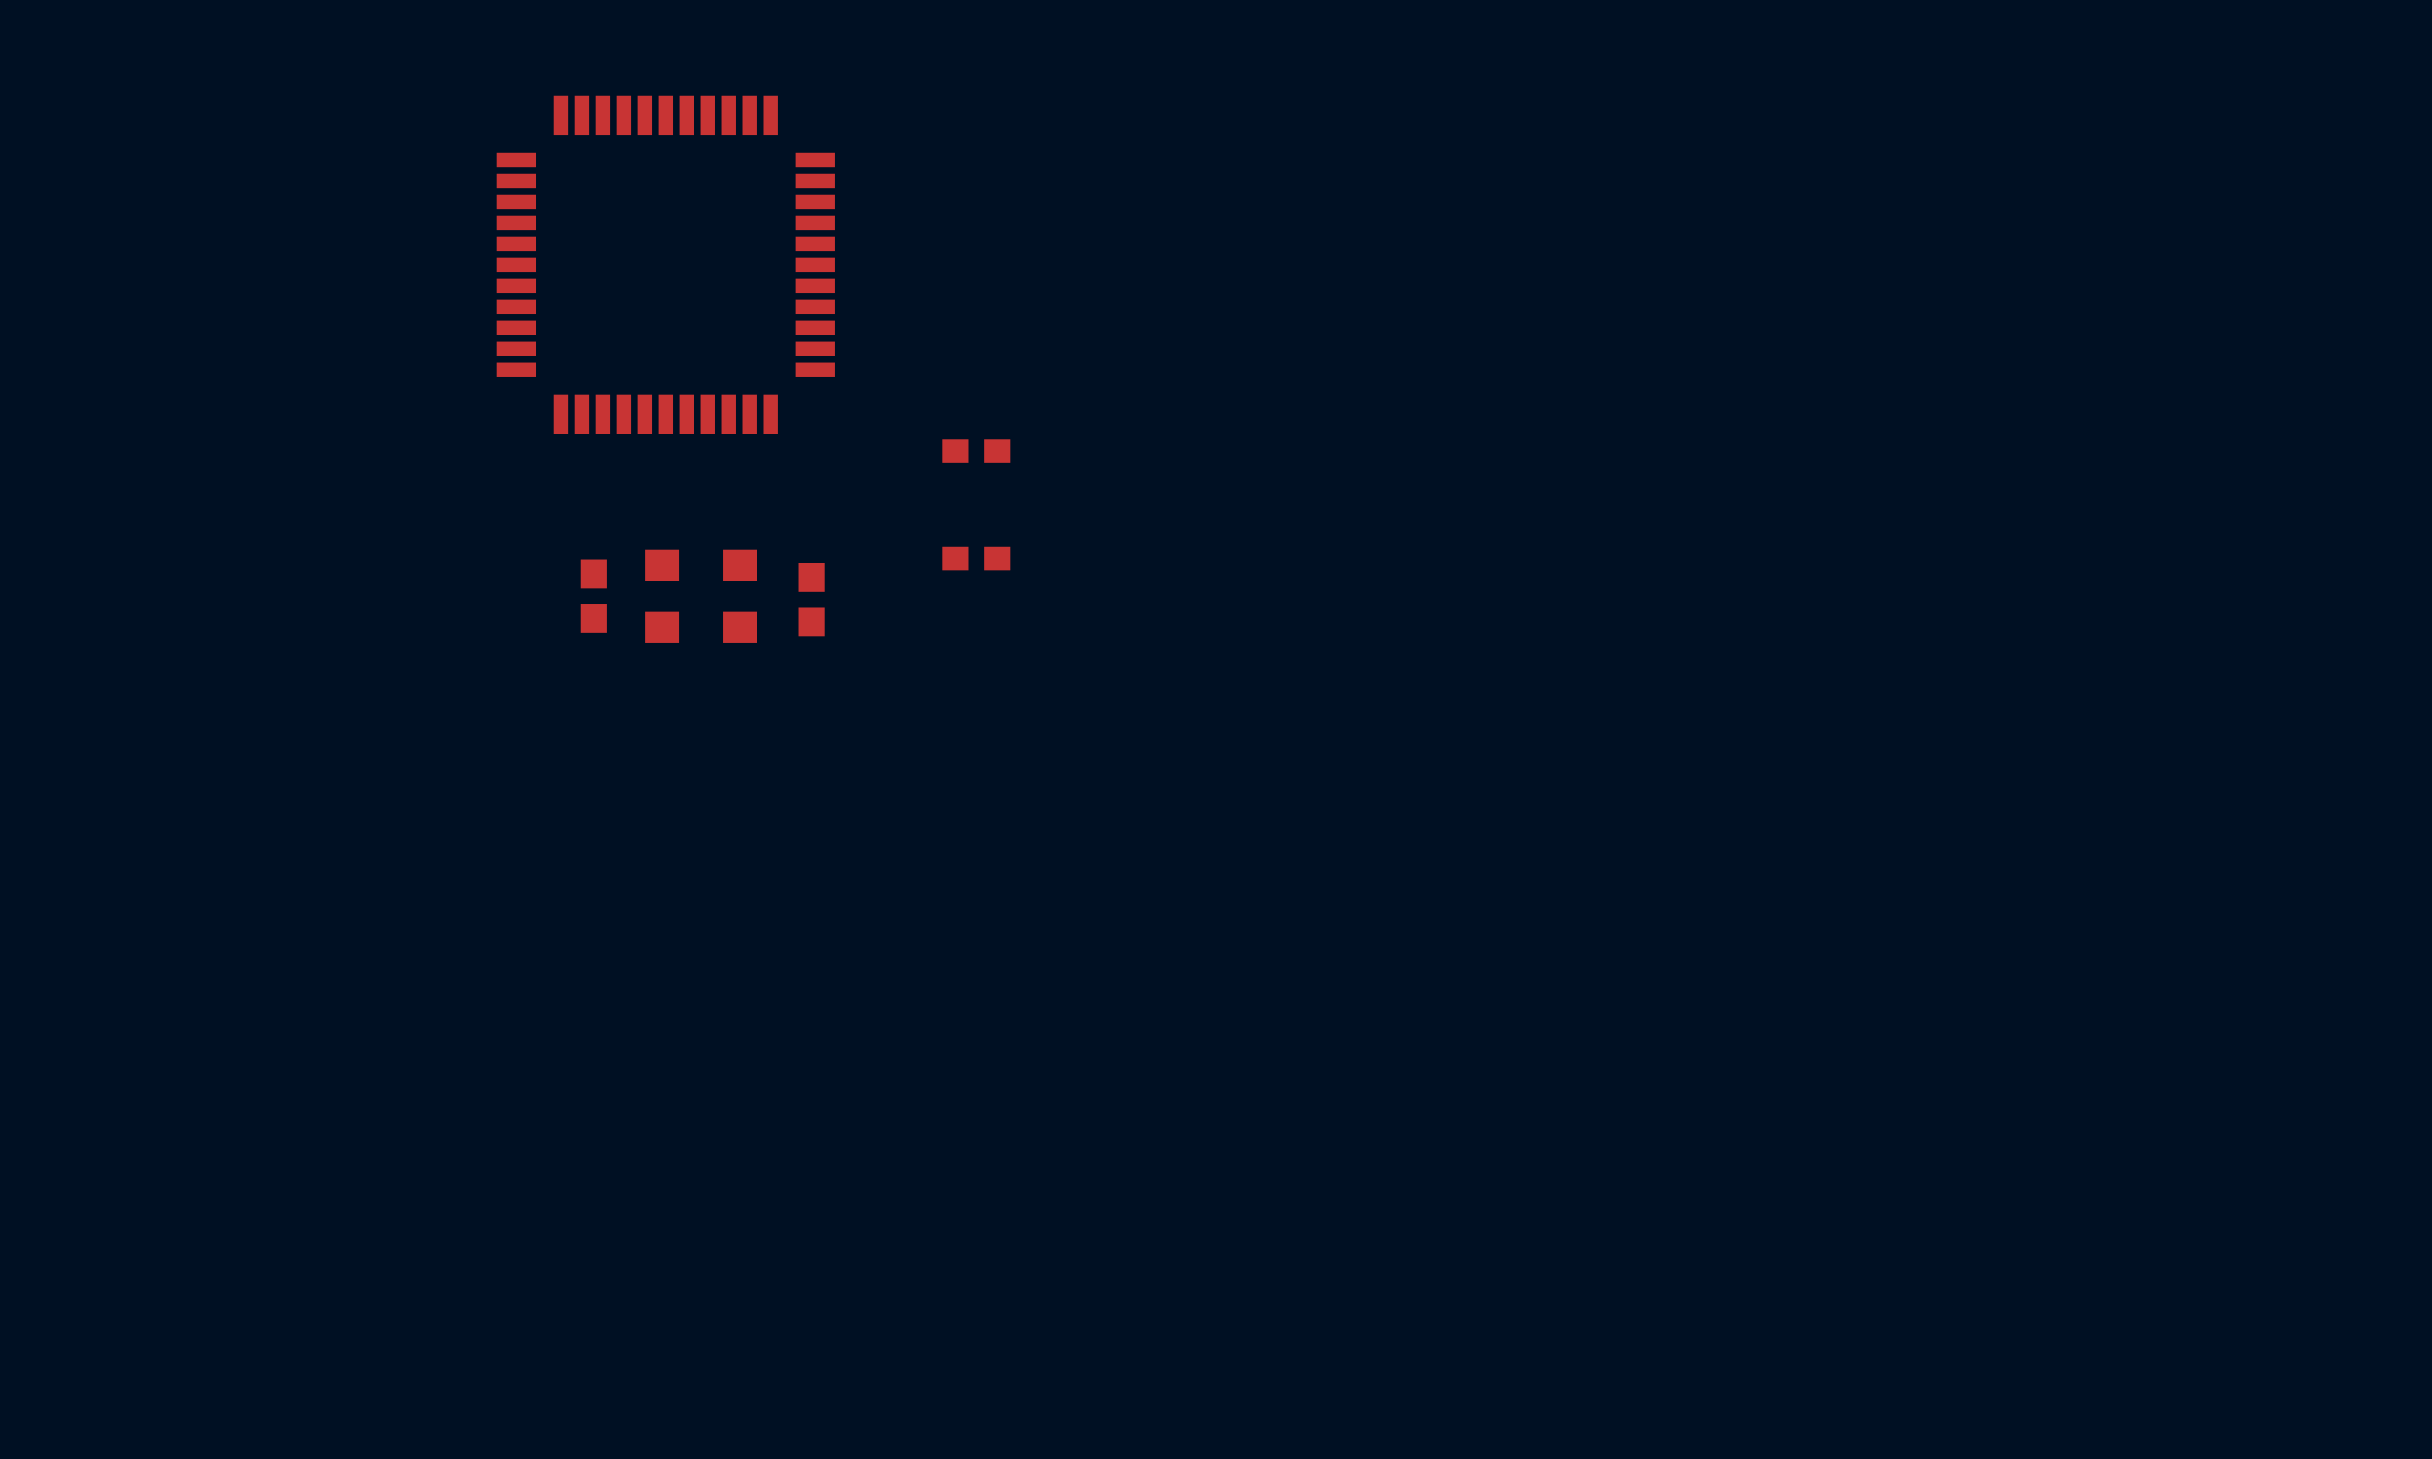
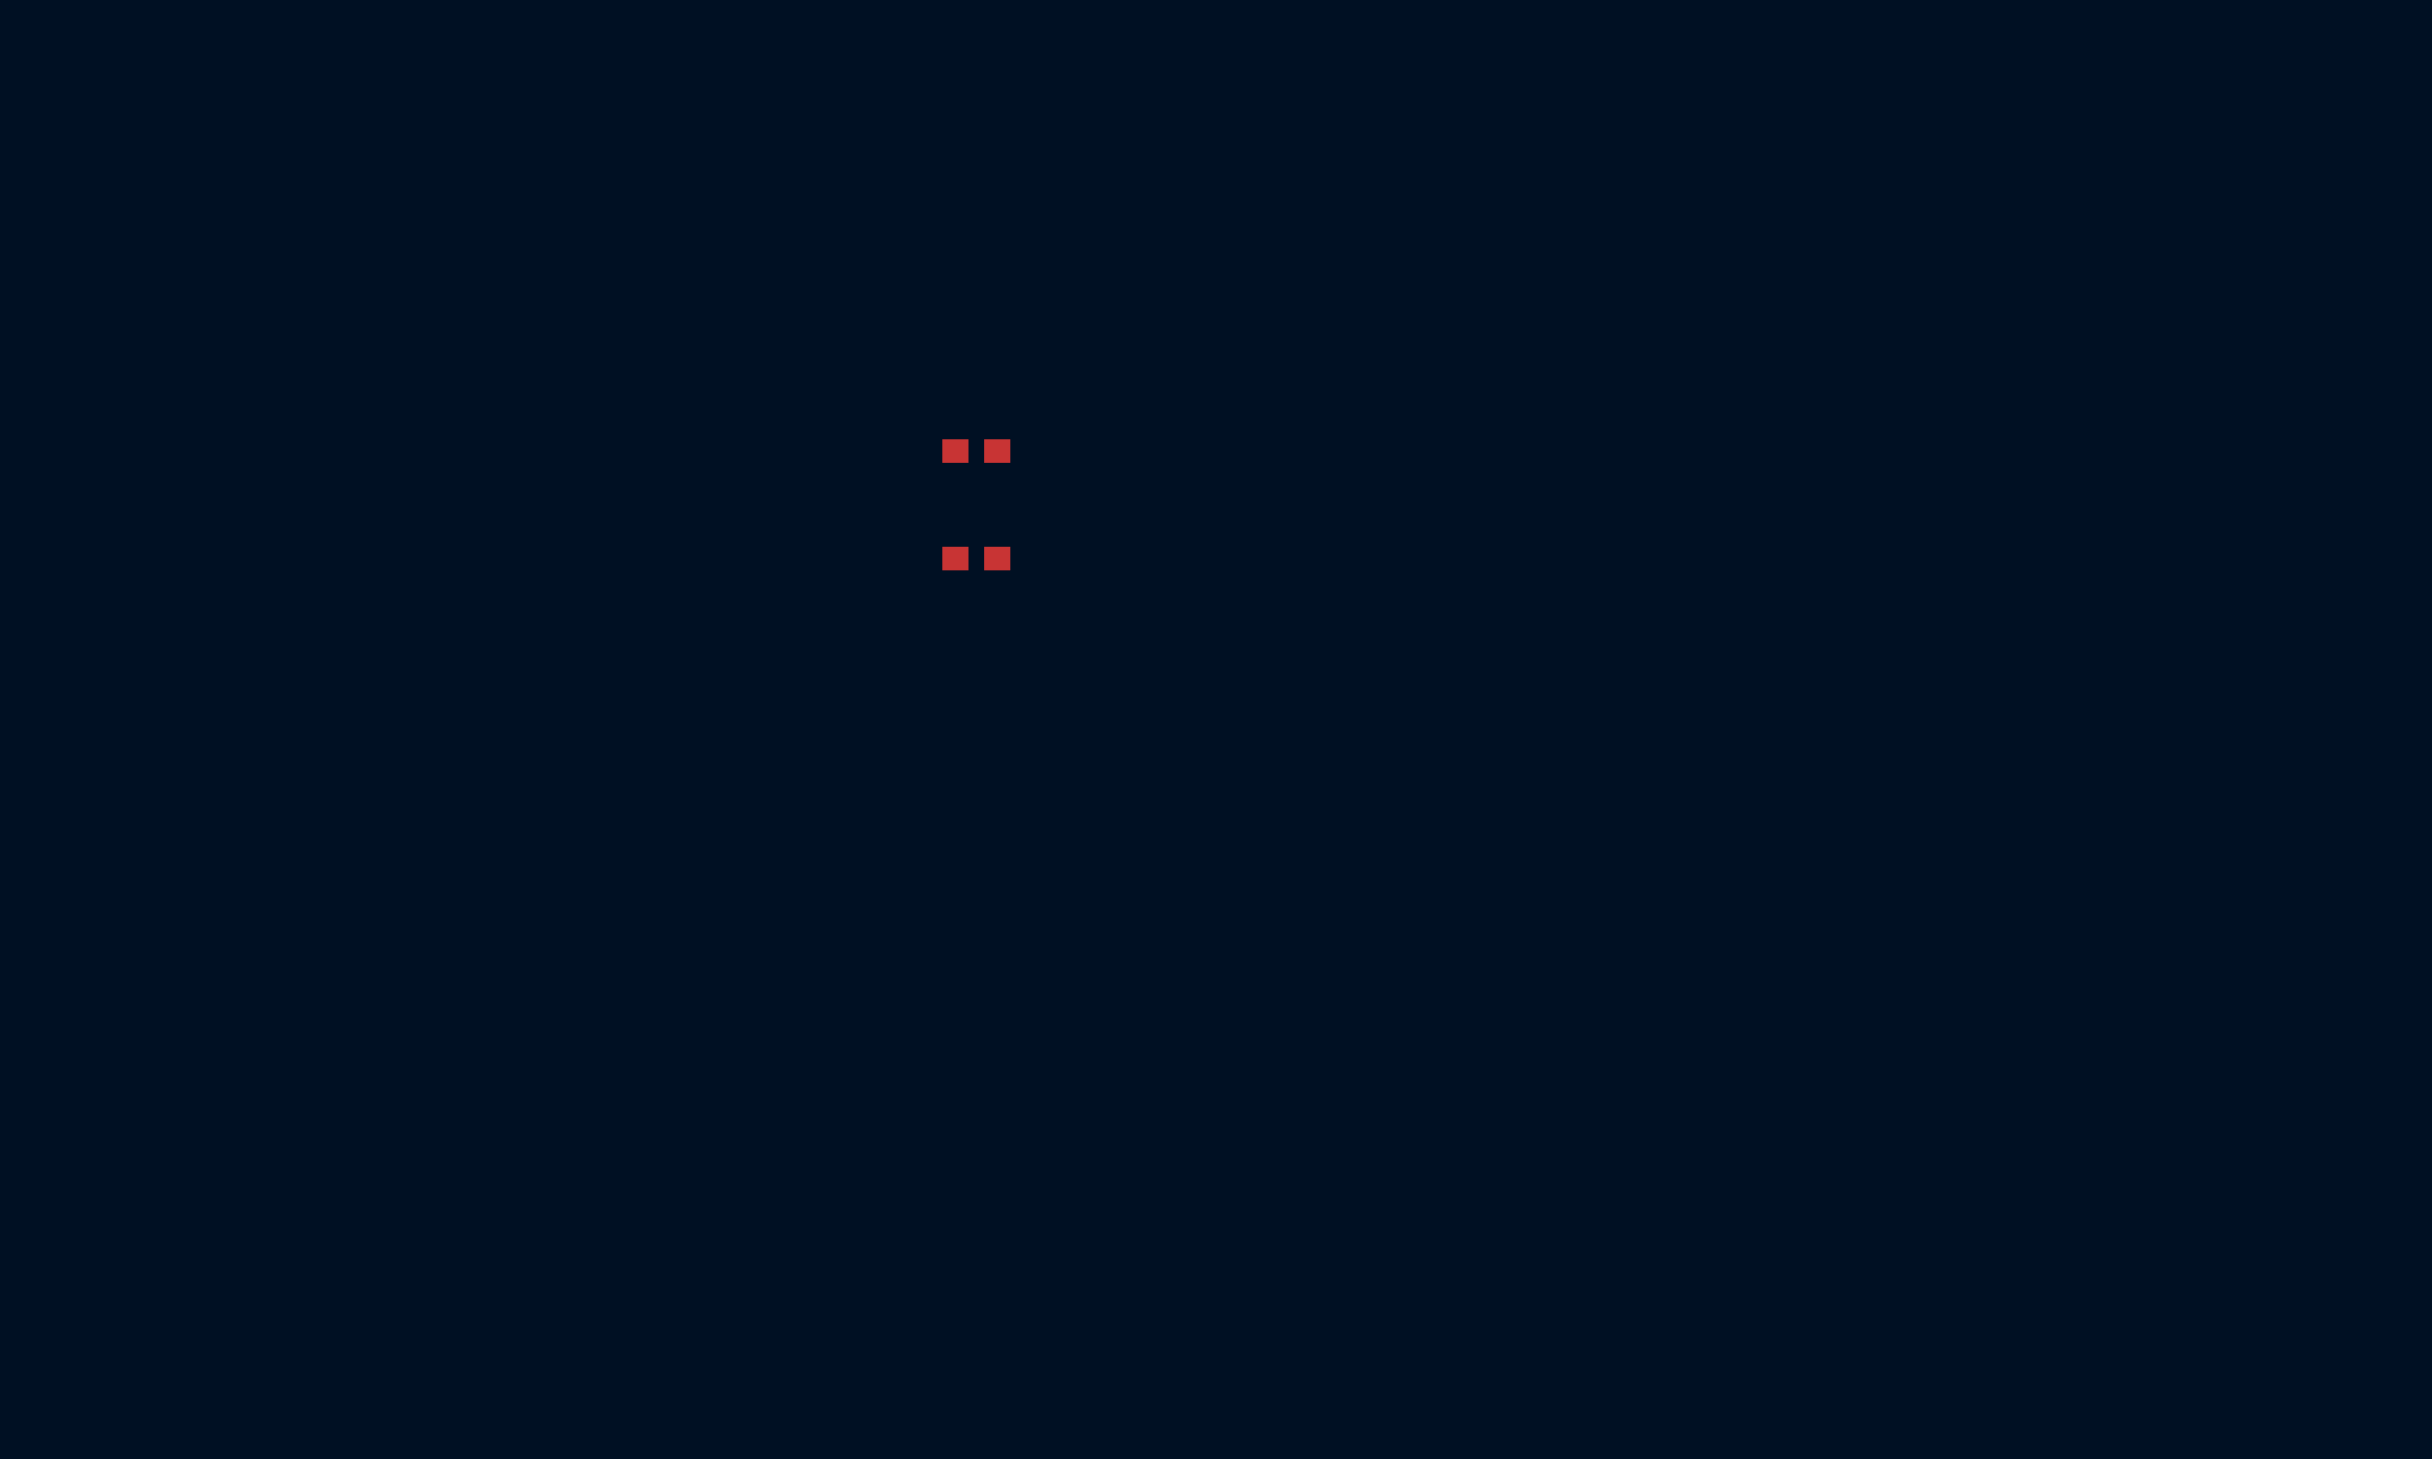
part: (665, 264) -> none
part: (593, 596) -> none
part: (701, 596) -> none
part: (811, 599) -> none

